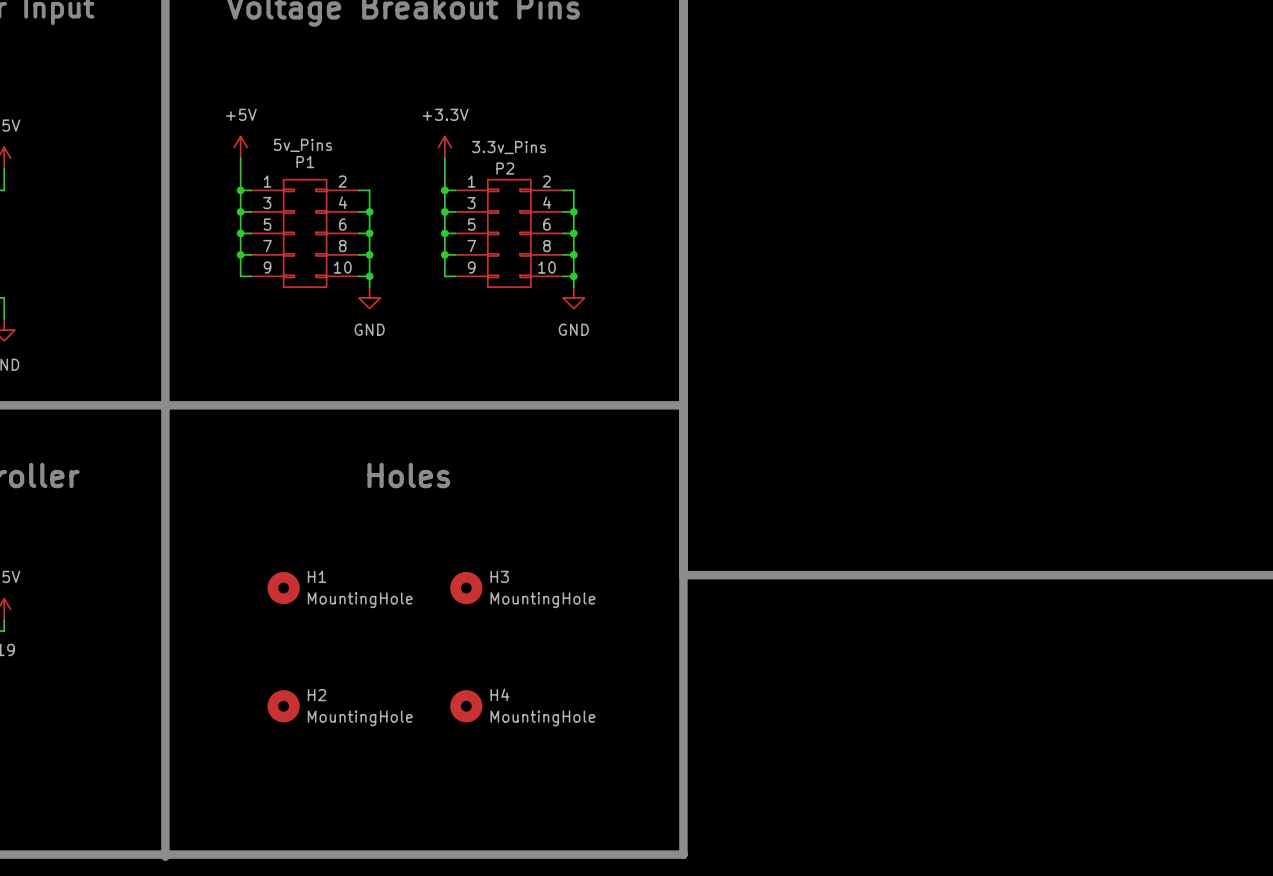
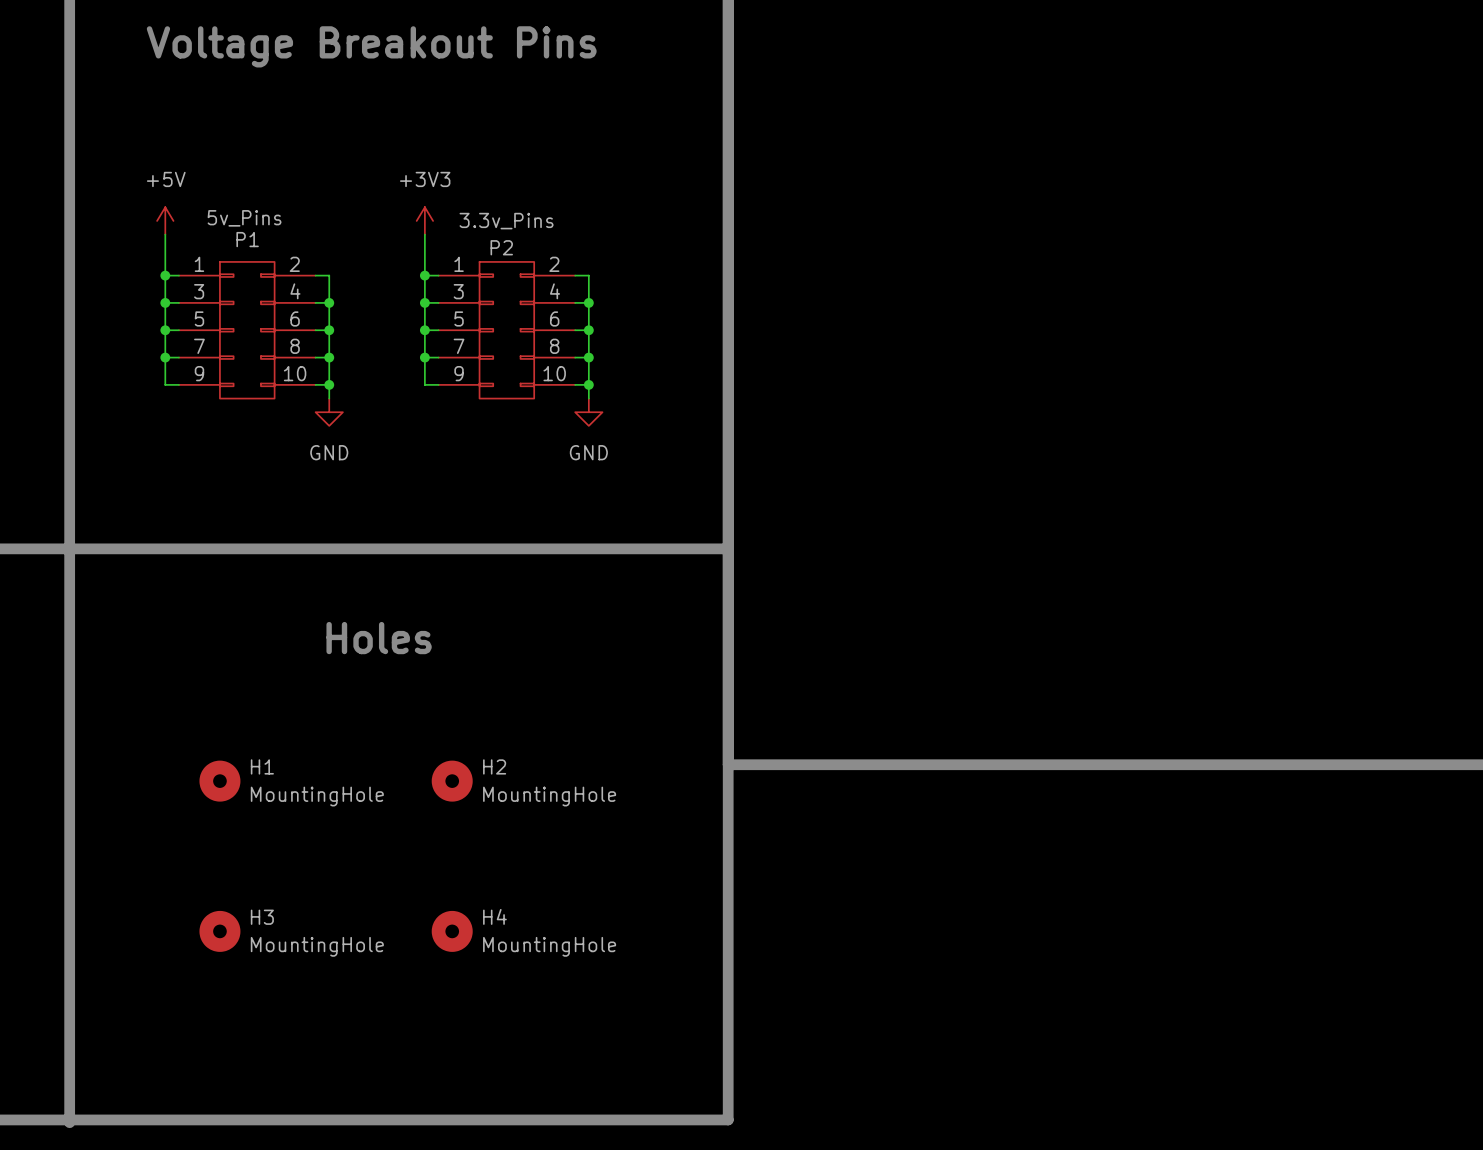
power symbol: +3.3V (444, 147) -> +3V3 (424, 220)
H3 name: H3 (499, 576) -> H2 (494, 766)
H2 name: H2 (316, 695) -> H3 (262, 917)

